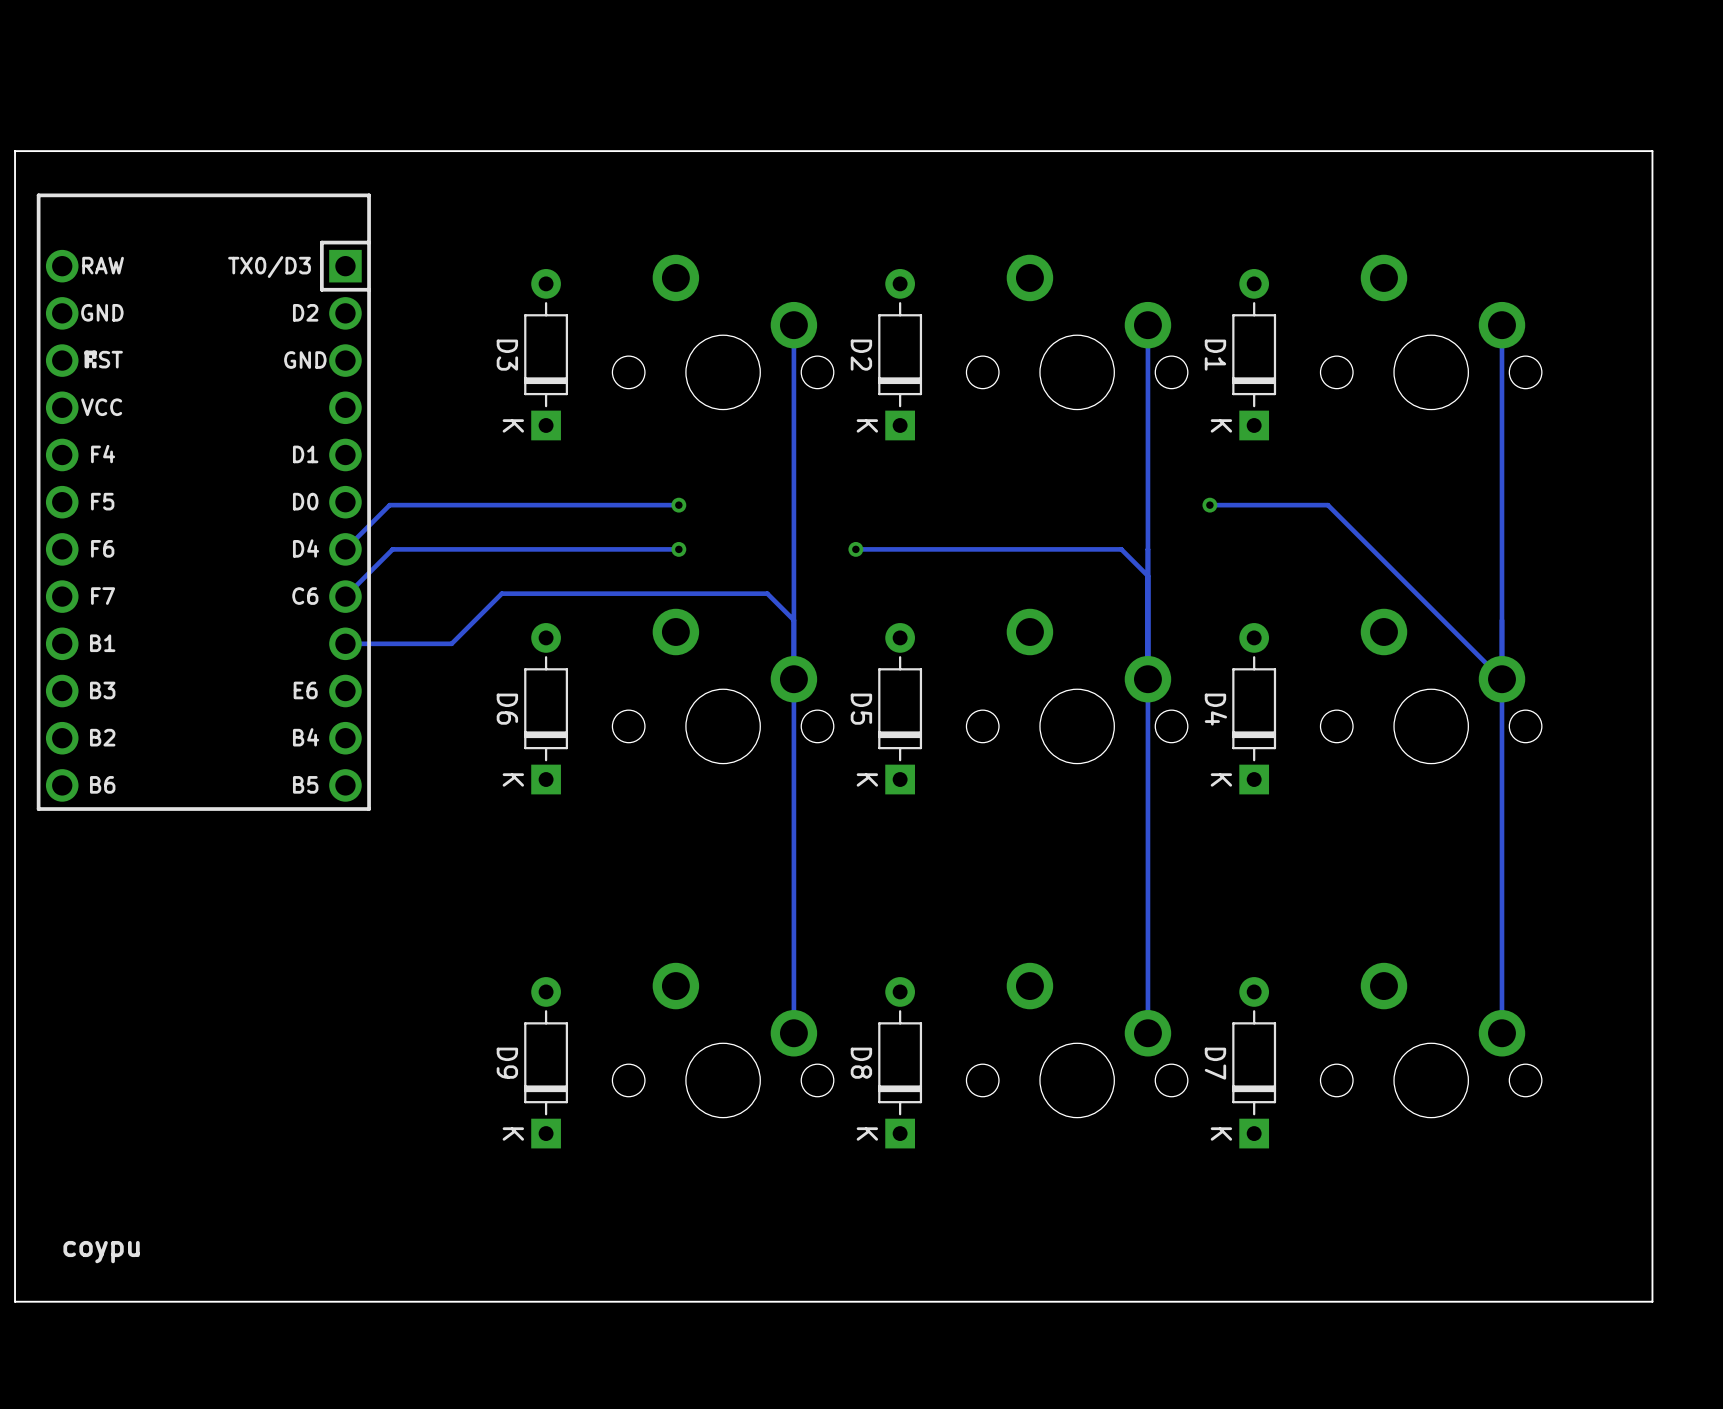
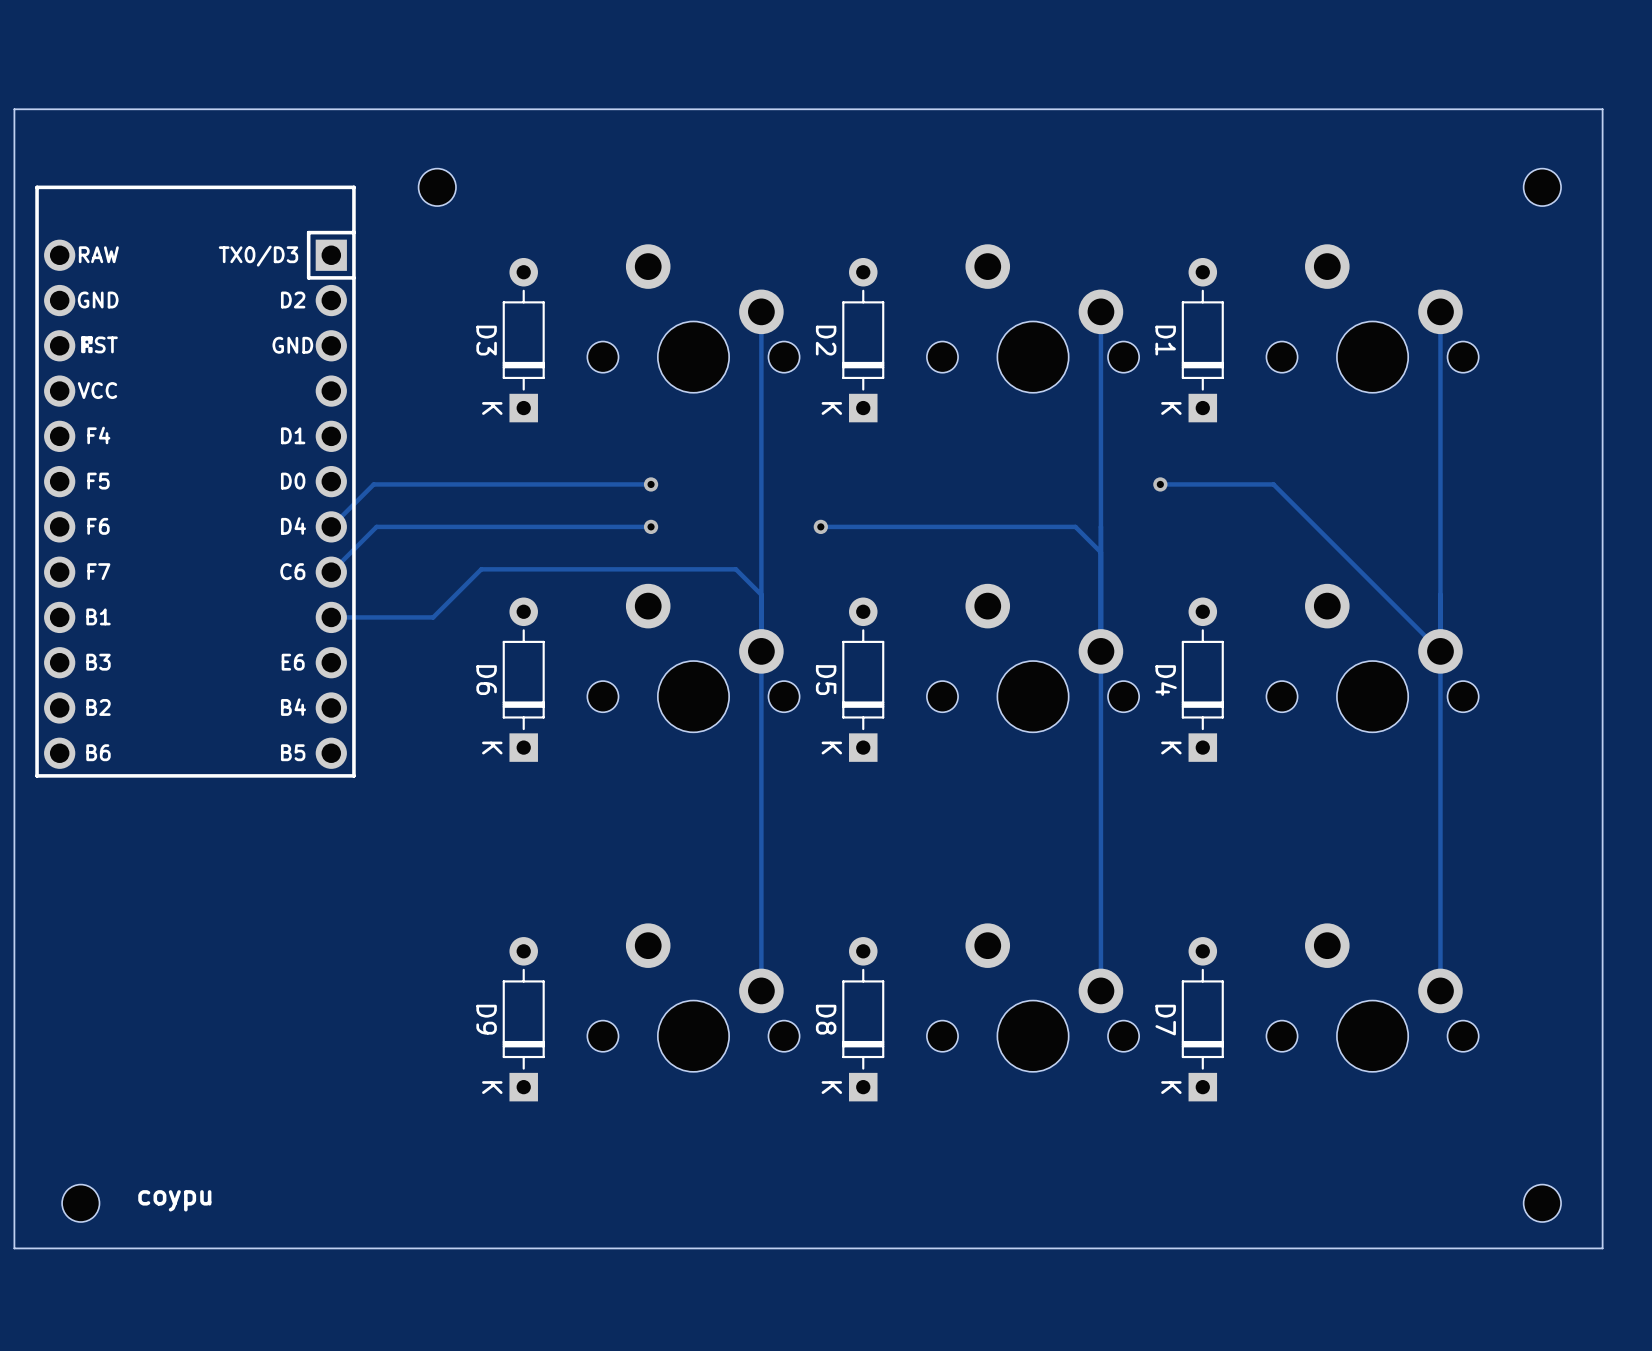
board edge: (15, 151) (1652, 151) (1652, 1301) -> (14, 144) (14, 109) (1602, 109) (1602, 1248) (1584, 1248)
part: none -> (437, 187)
part: none -> (1542, 187)
text position: coypu (101, 1252) -> coypu (174, 1200)
part: none -> (80, 1203)
part: none -> (1542, 1203)

